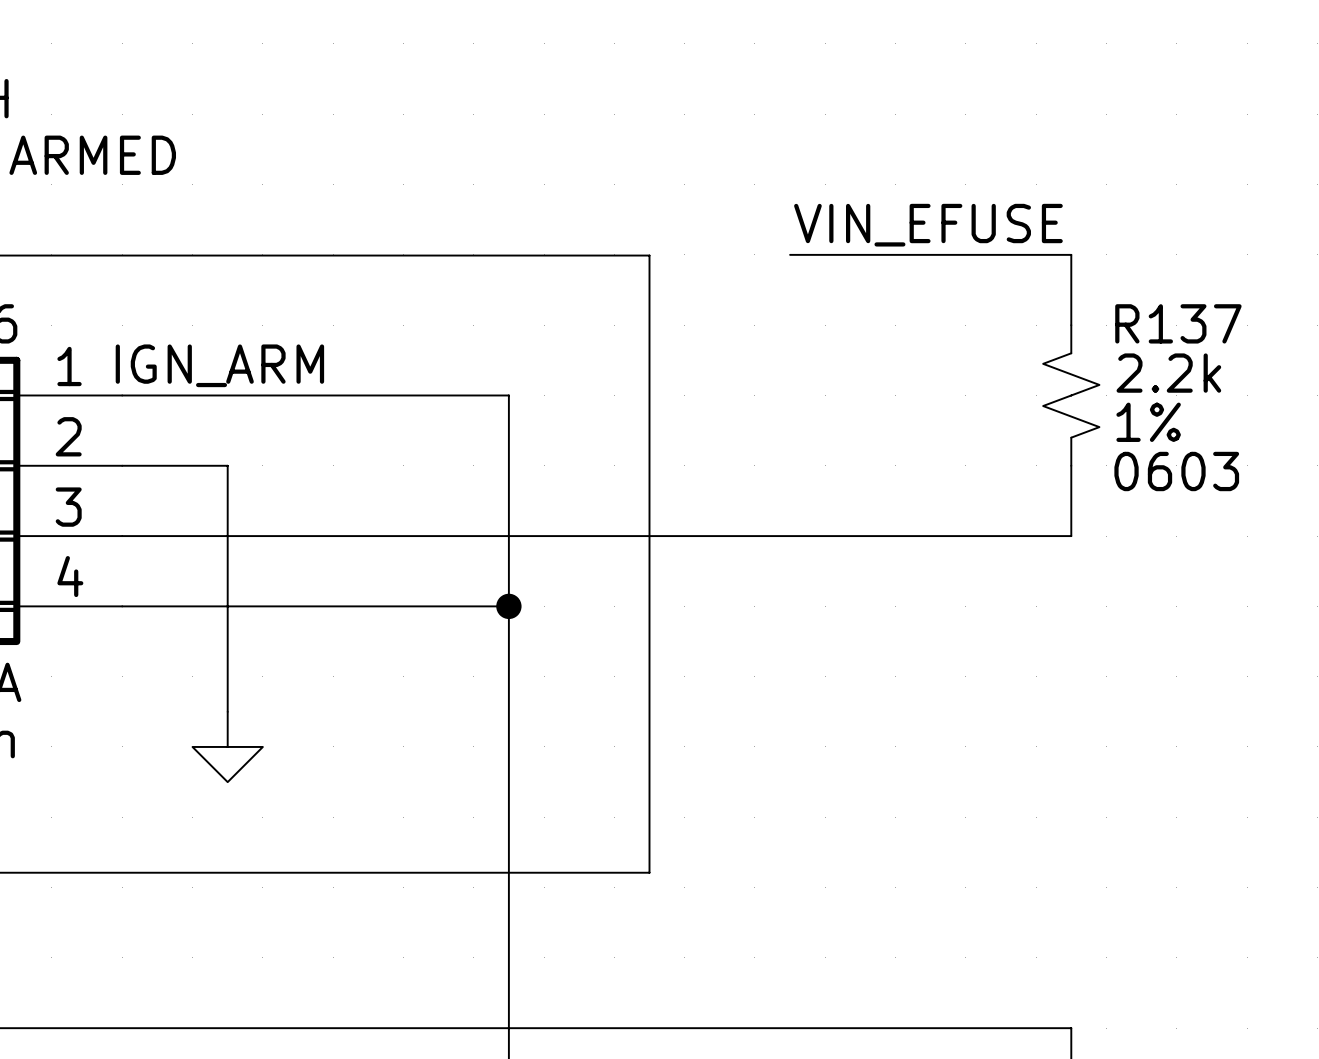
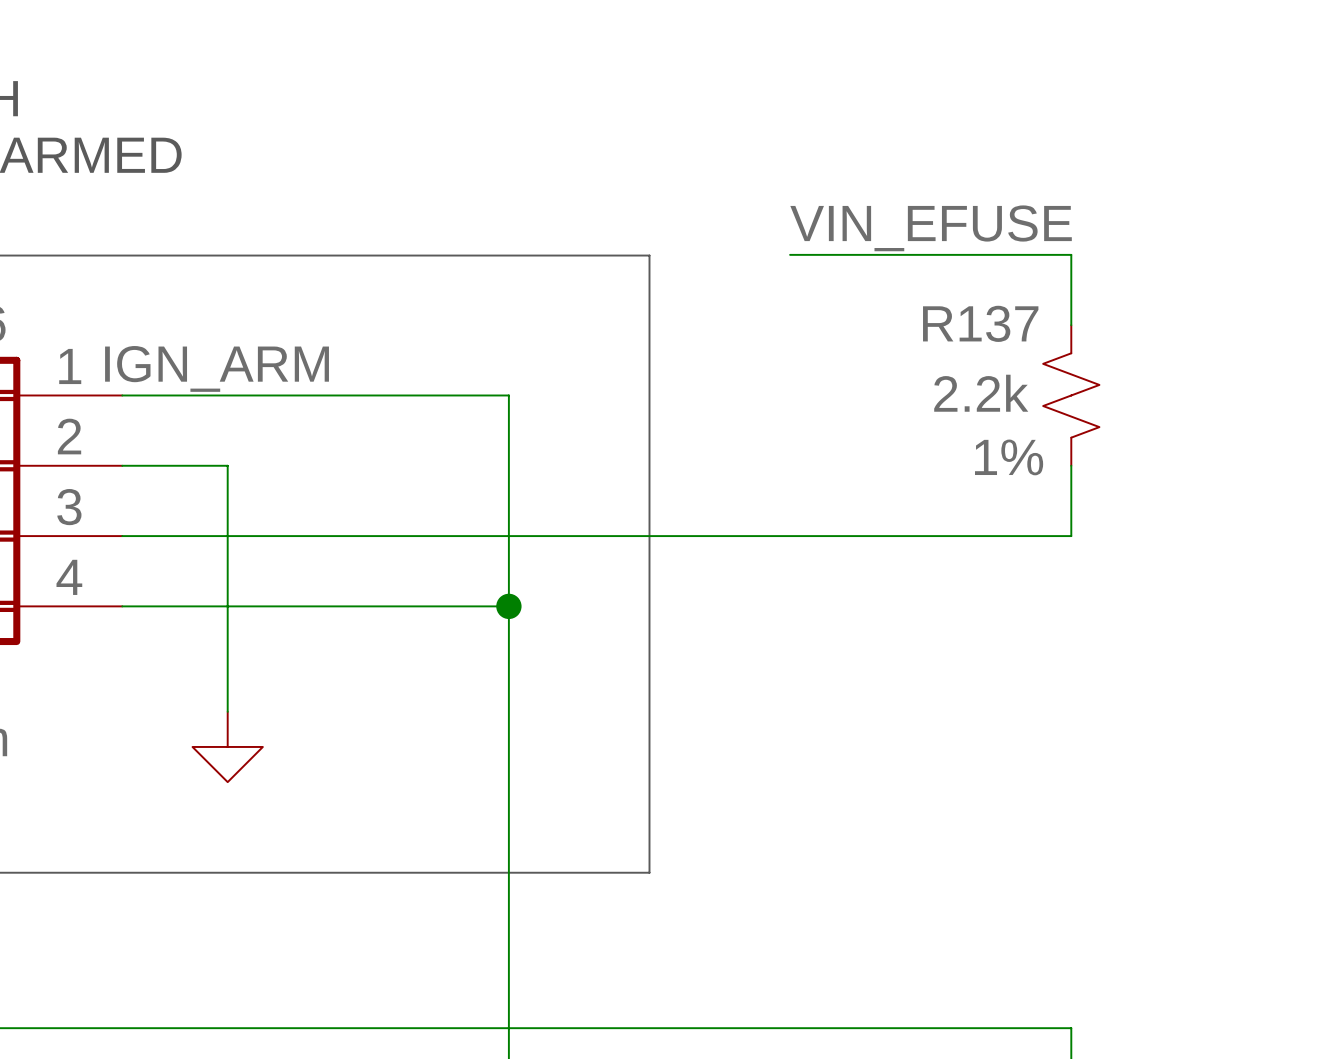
R137 name position: R137 (1178, 323) -> R137 (980, 323)
R137 value position: 2.2k (1168, 373) -> 2.2k (981, 393)
R137 text position: 1% (1148, 422) -> 1% (1009, 457)
R137 text: 0603 (1176, 471) -> none

